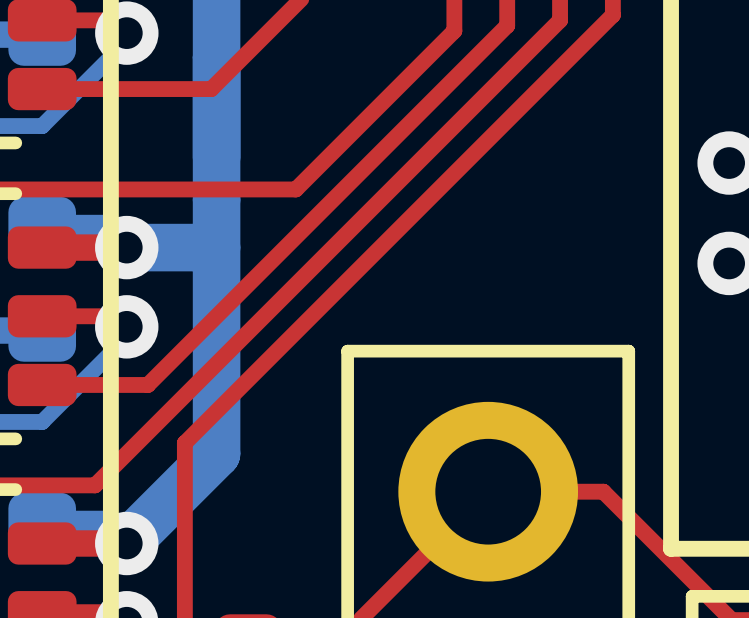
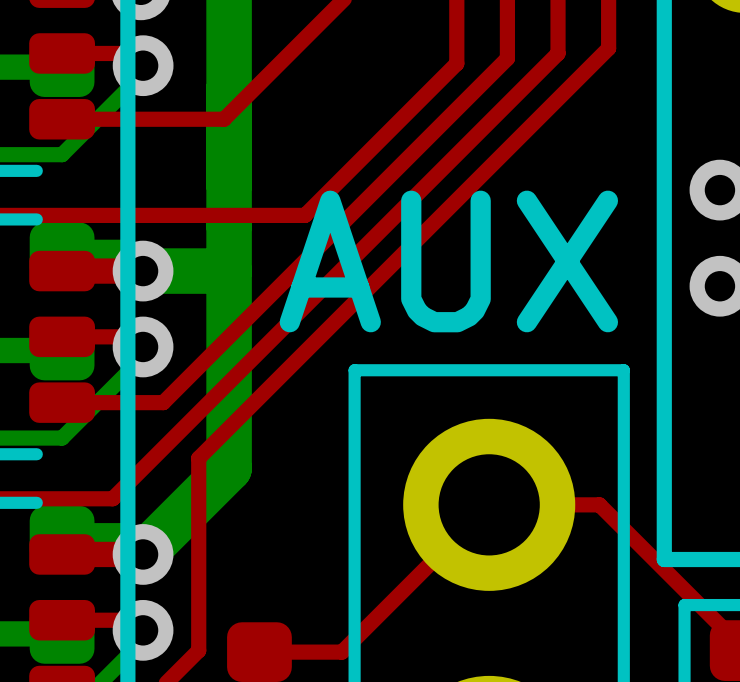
text: none -> AUX (448, 261)

